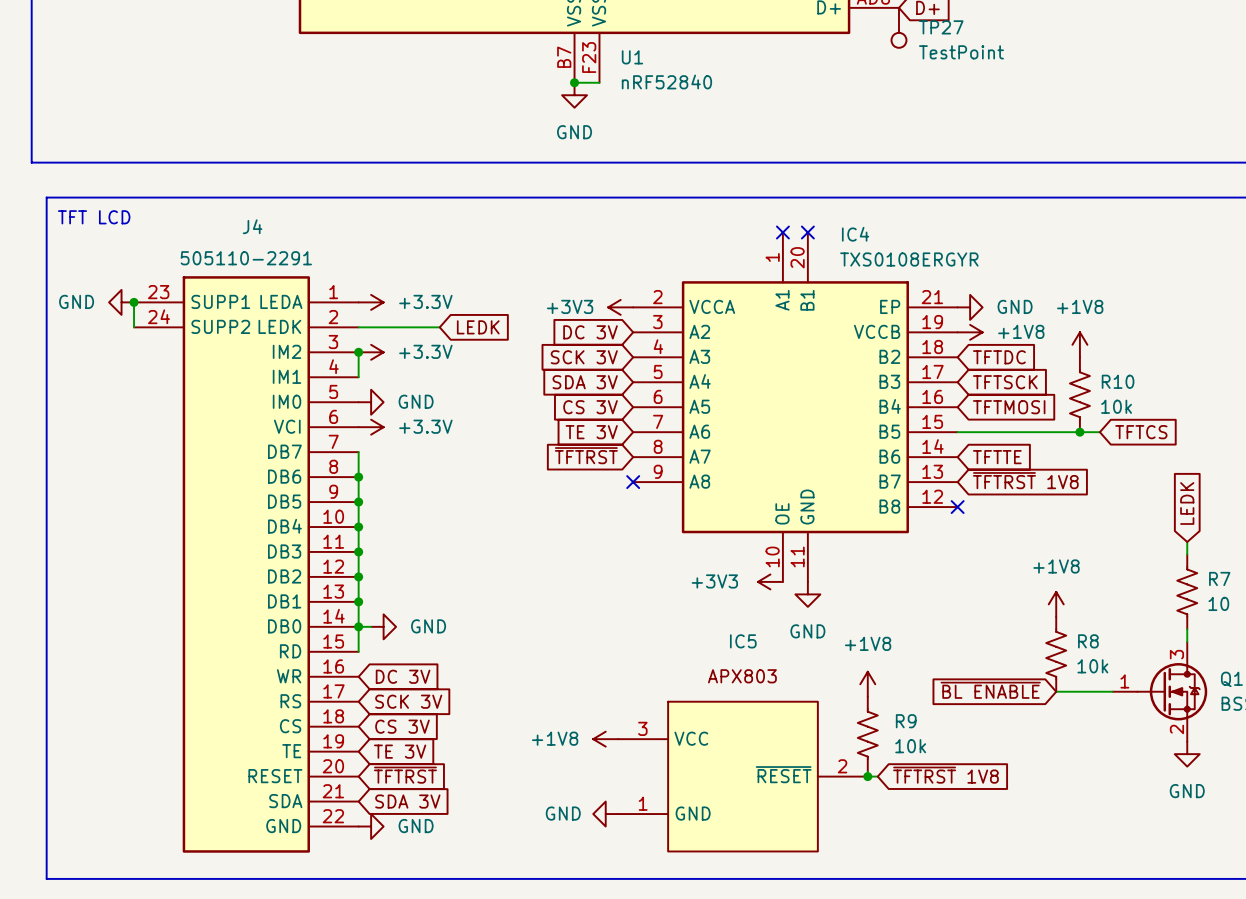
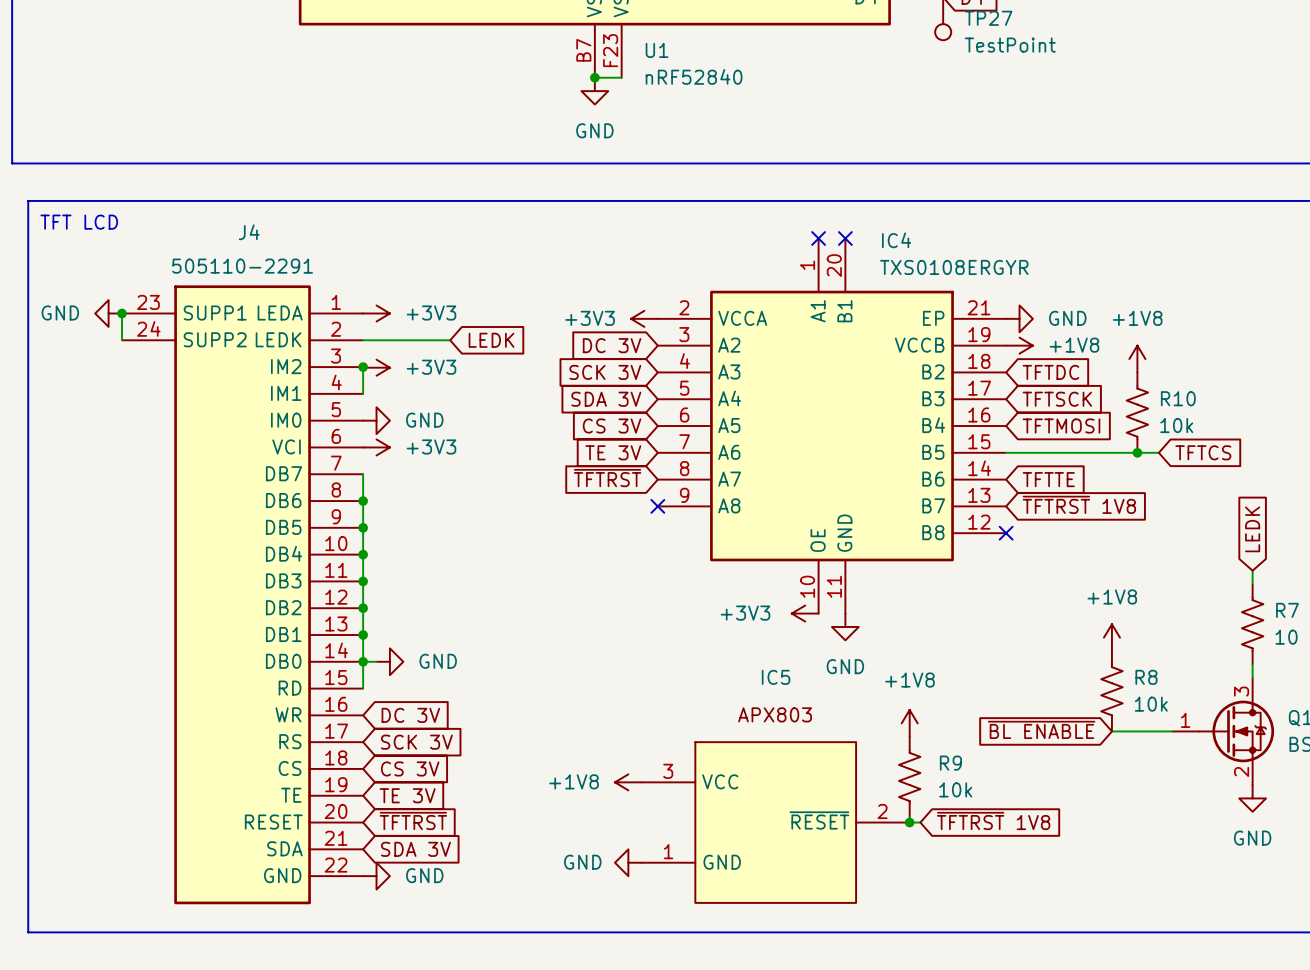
power symbol: +3.3V (371, 302) -> +3V3 (376, 313)
power symbol: +3.3V (371, 352) -> +3V3 (376, 367)
power symbol: +3.3V (371, 427) -> +3V3 (376, 447)

